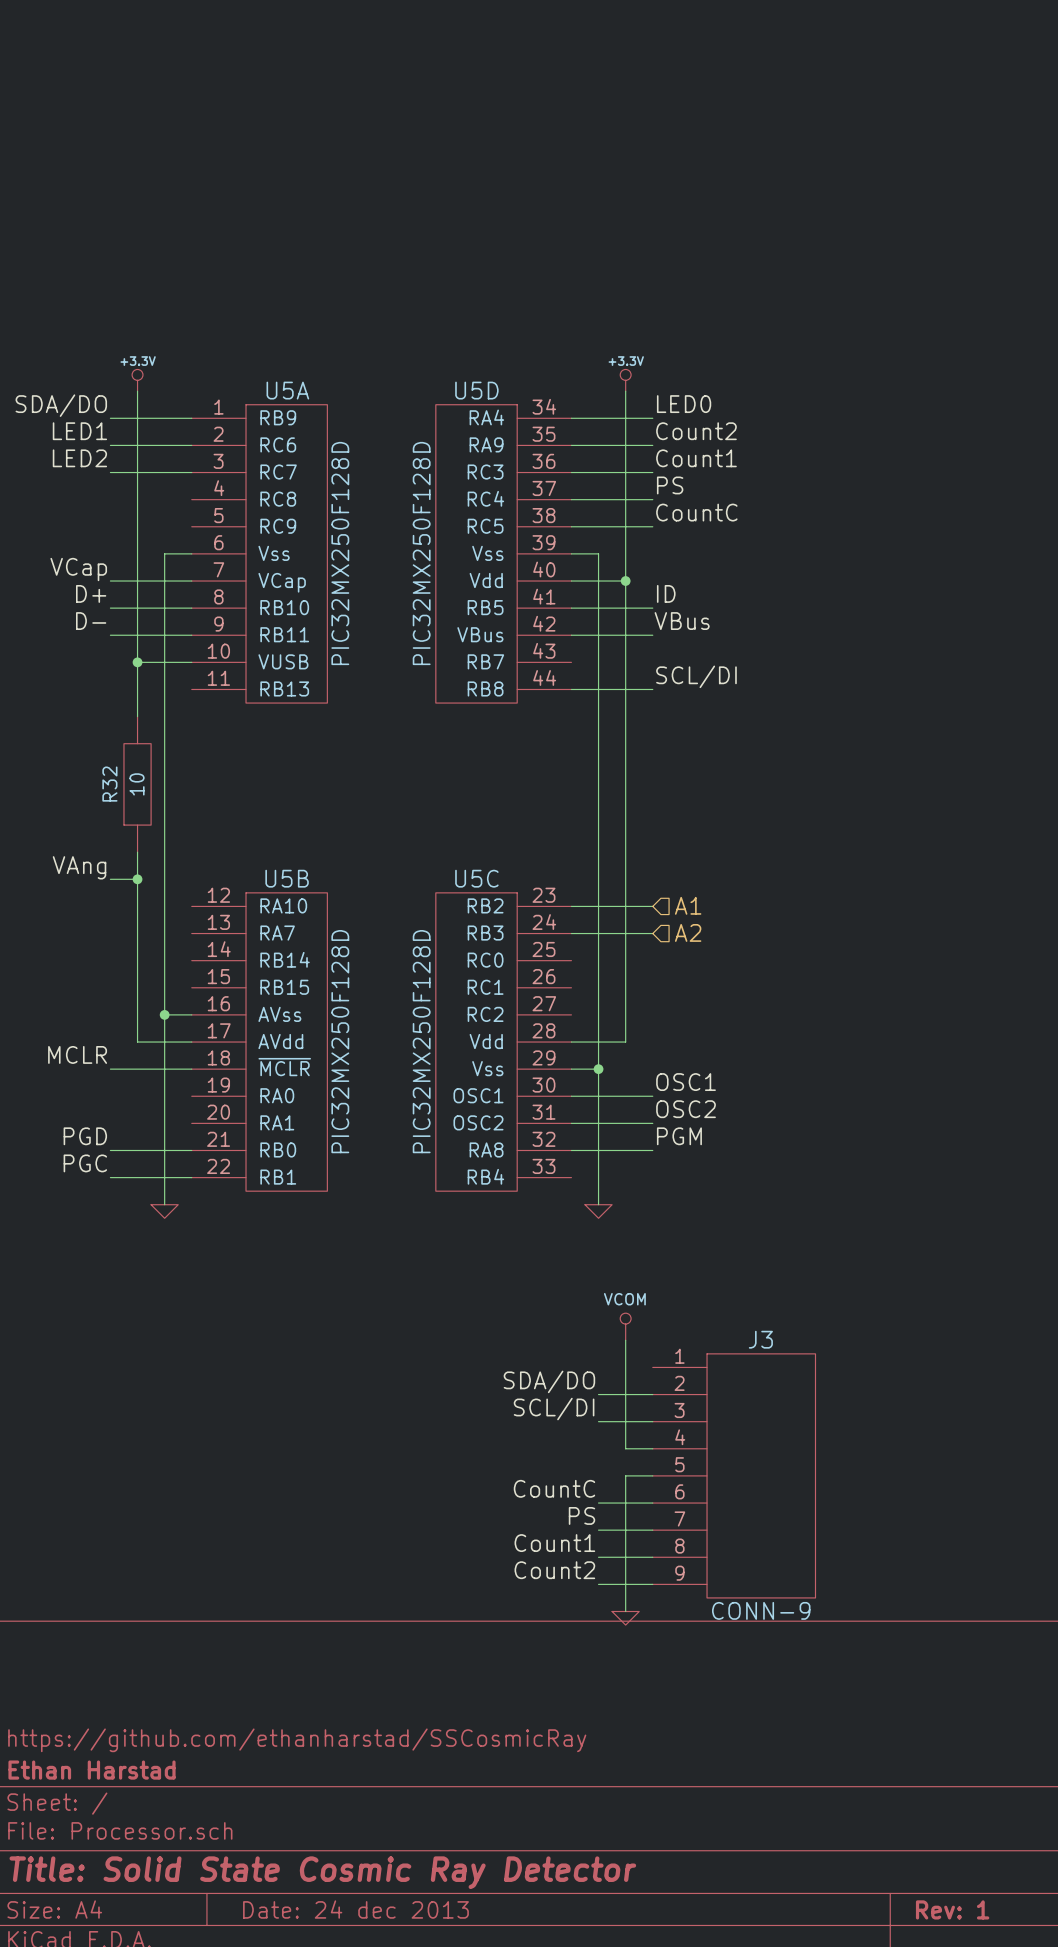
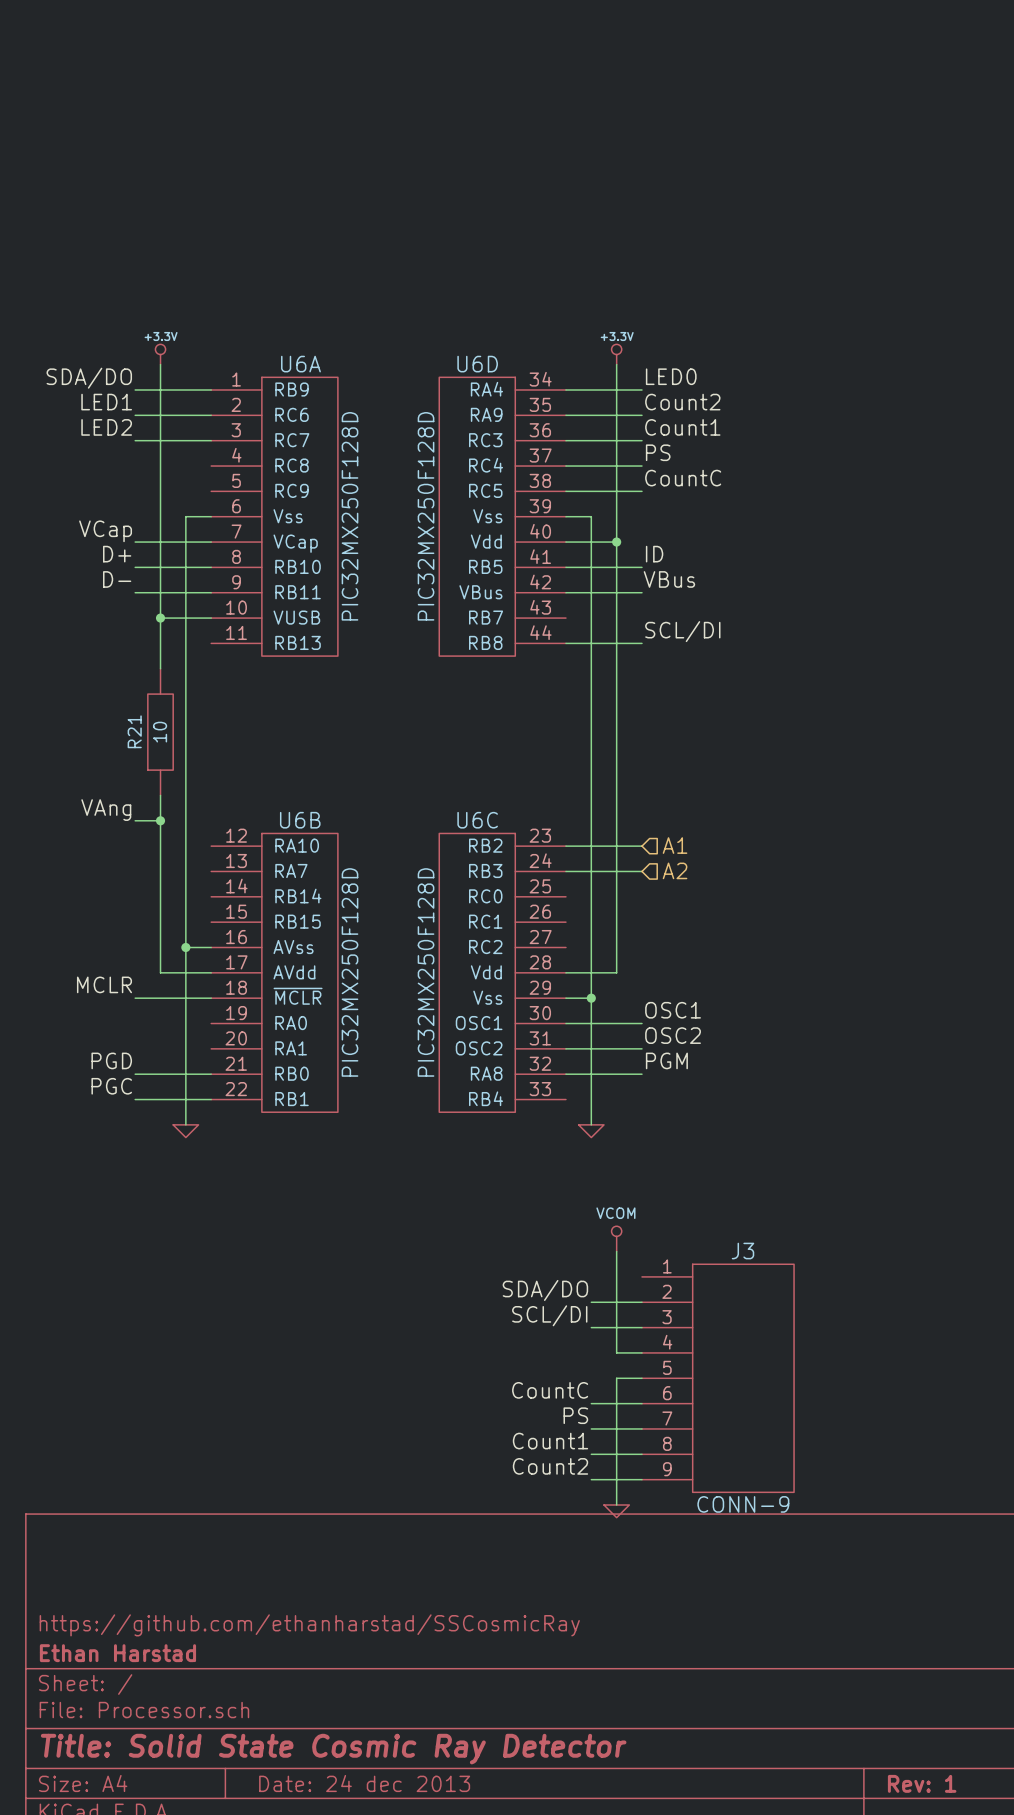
U5A name: U5A (287, 390) -> U6A (300, 364)
U5D name: U5D (476, 390) -> U6D (477, 364)
R32 name: R32 (109, 784) -> R21 (134, 731)
U5B name: U5B (287, 878) -> U6B (300, 820)
U5C name: U5C (476, 878) -> U6C (477, 820)

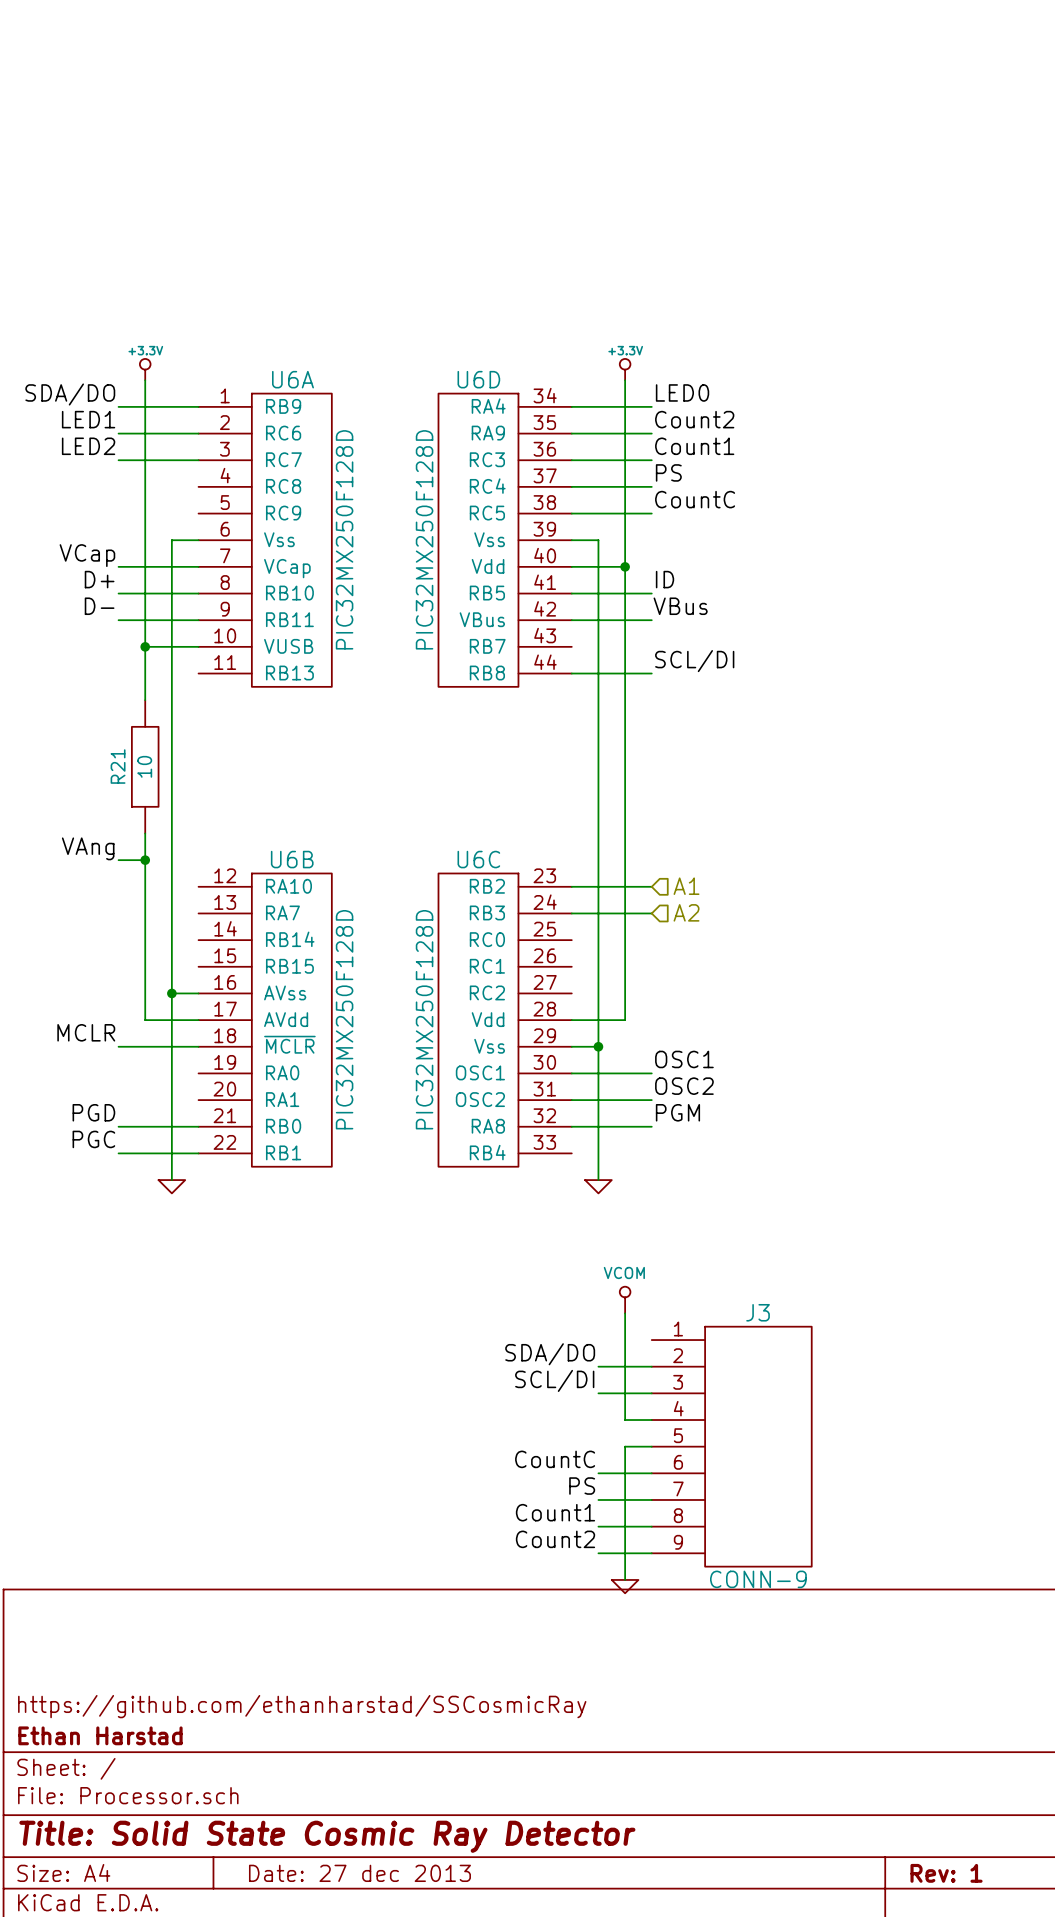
title block: Date: 24 dec 2013 (364, 1783) -> Date: 27 dec 2013 (359, 1873)

